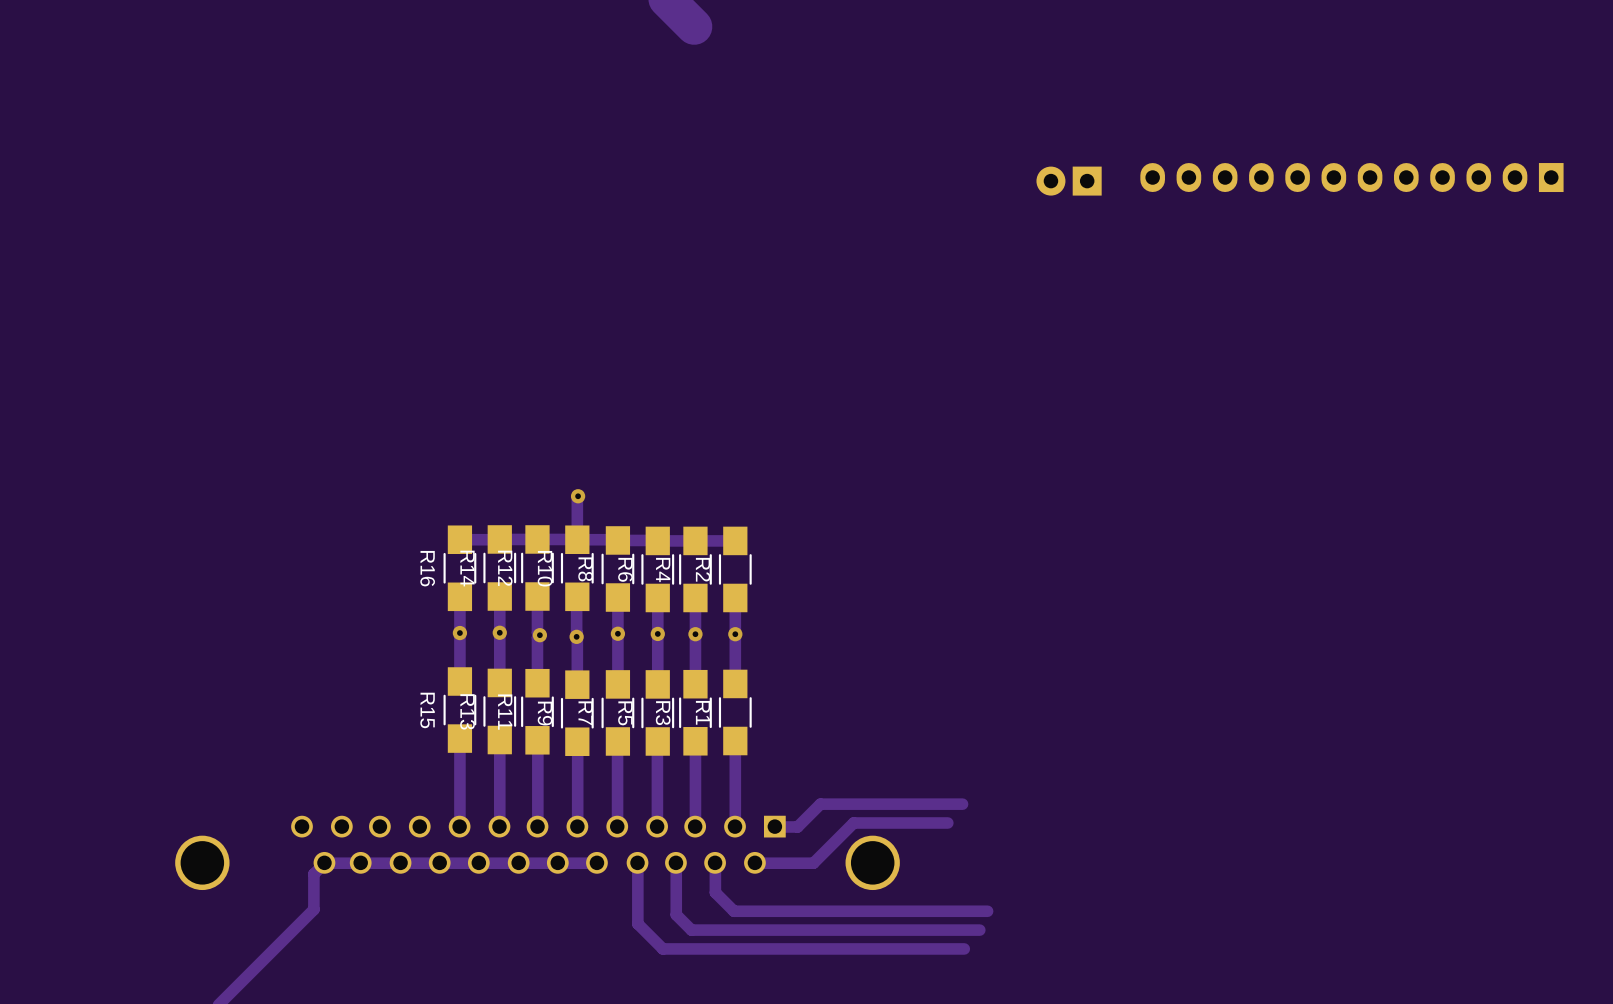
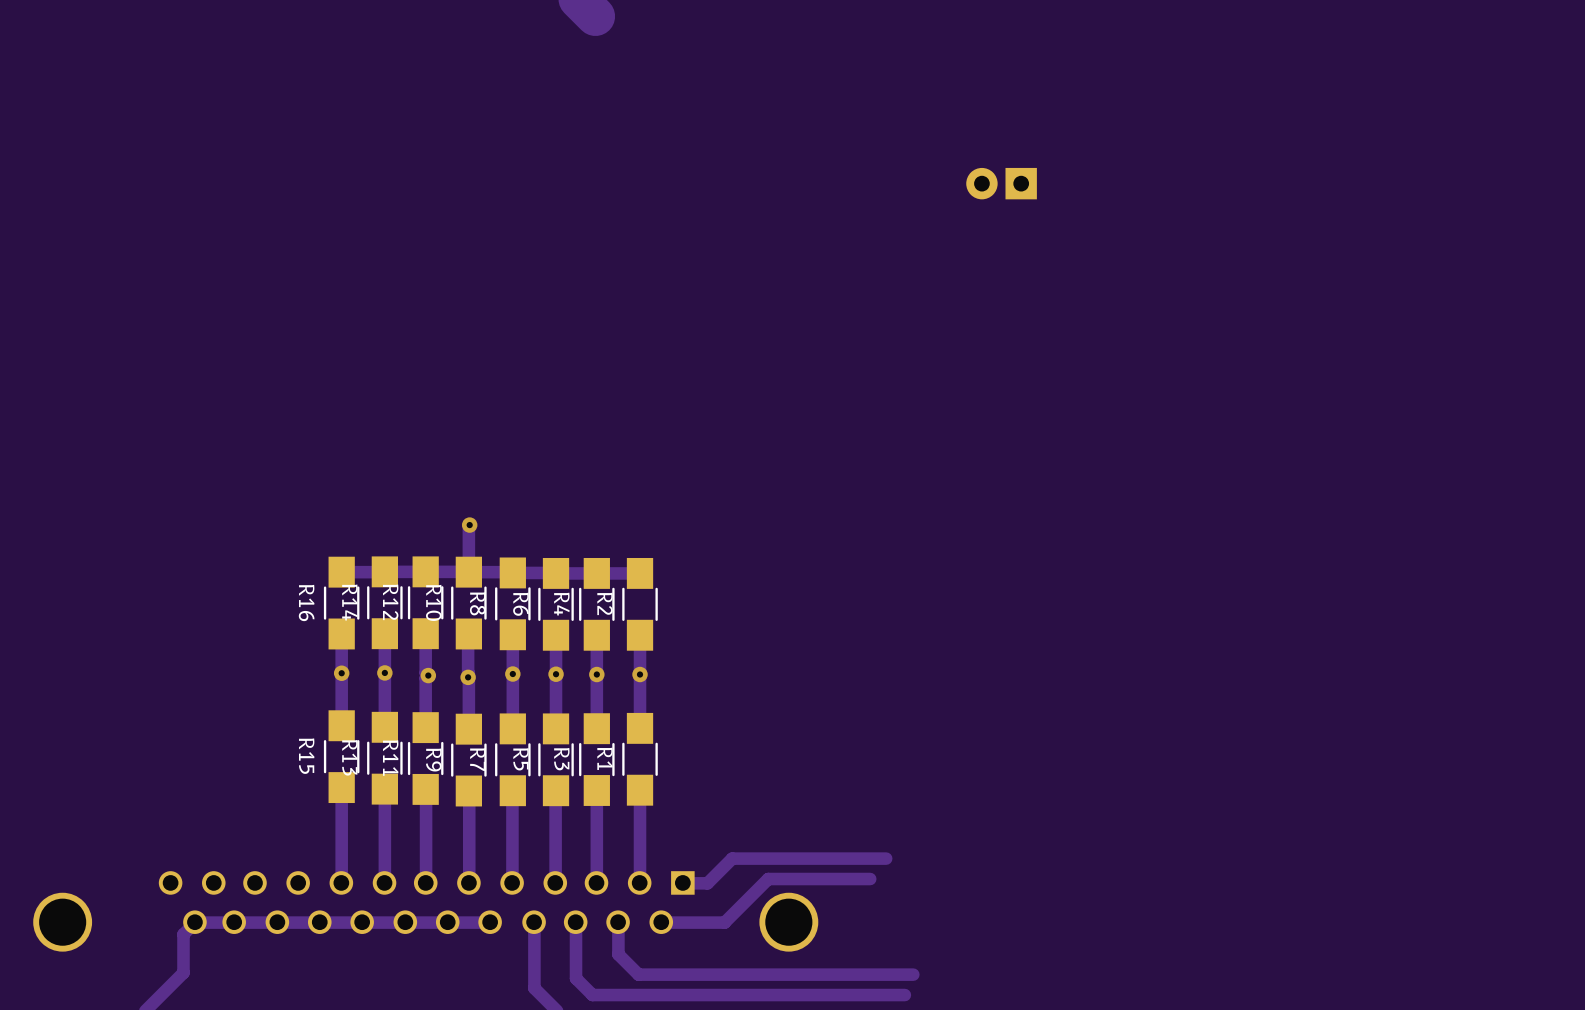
part: (1351, 177) -> none

